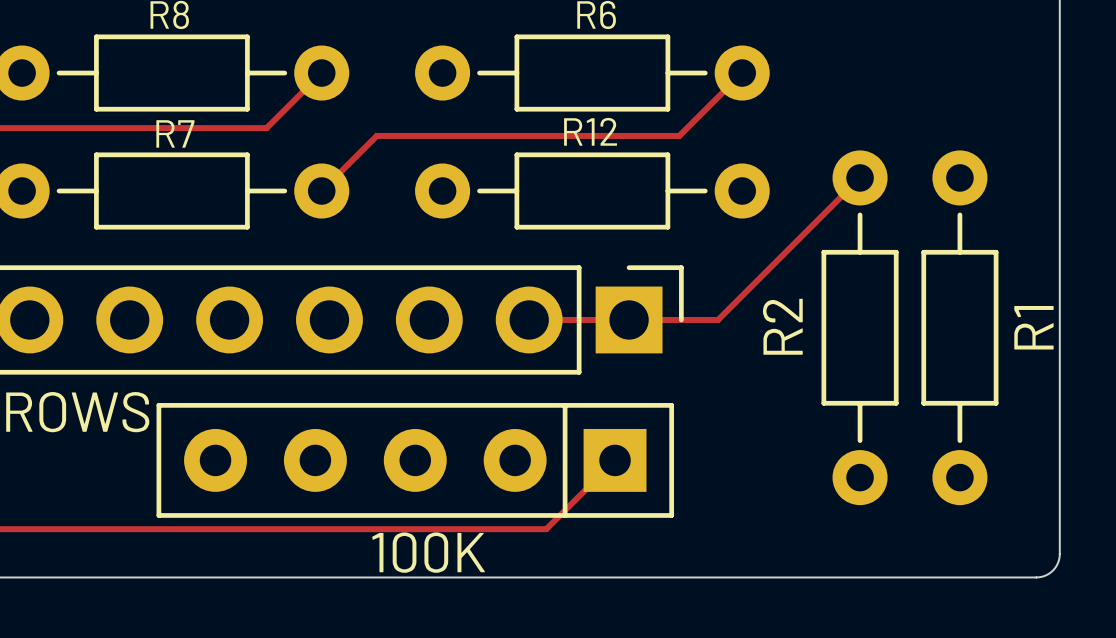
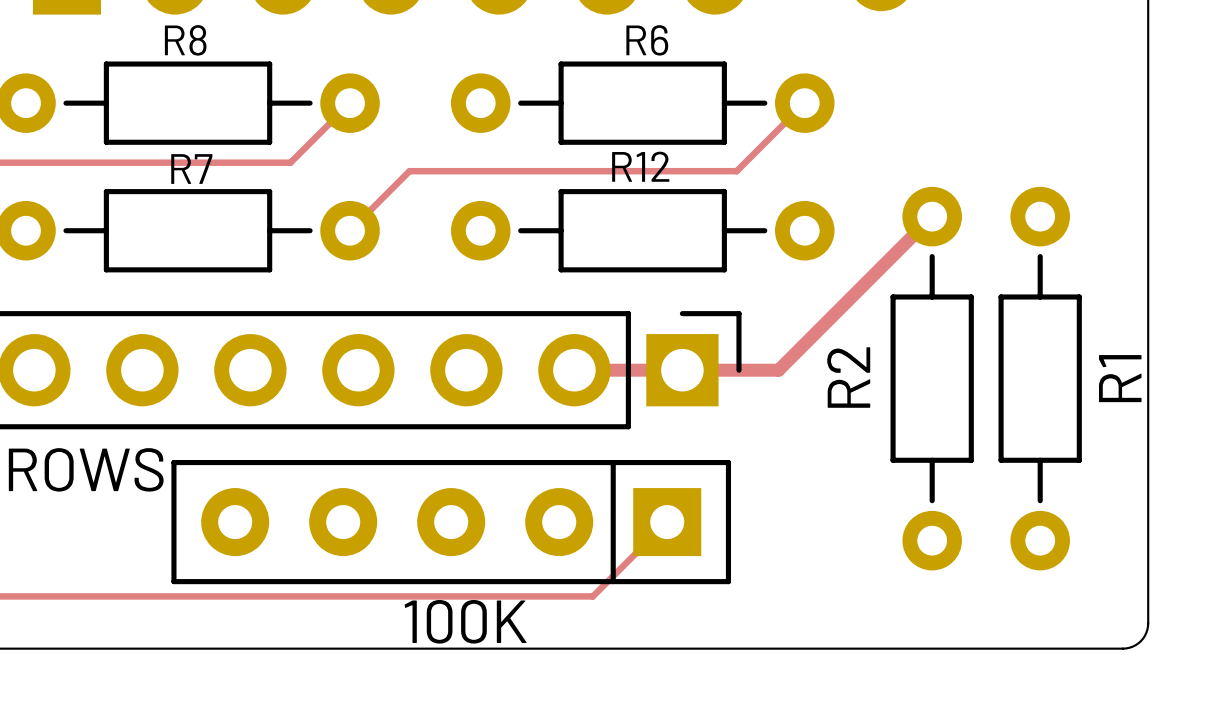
track width: thin (860, 177) (718, 319) (529, 319) -> thick (932, 216) (778, 370) (574, 370)

